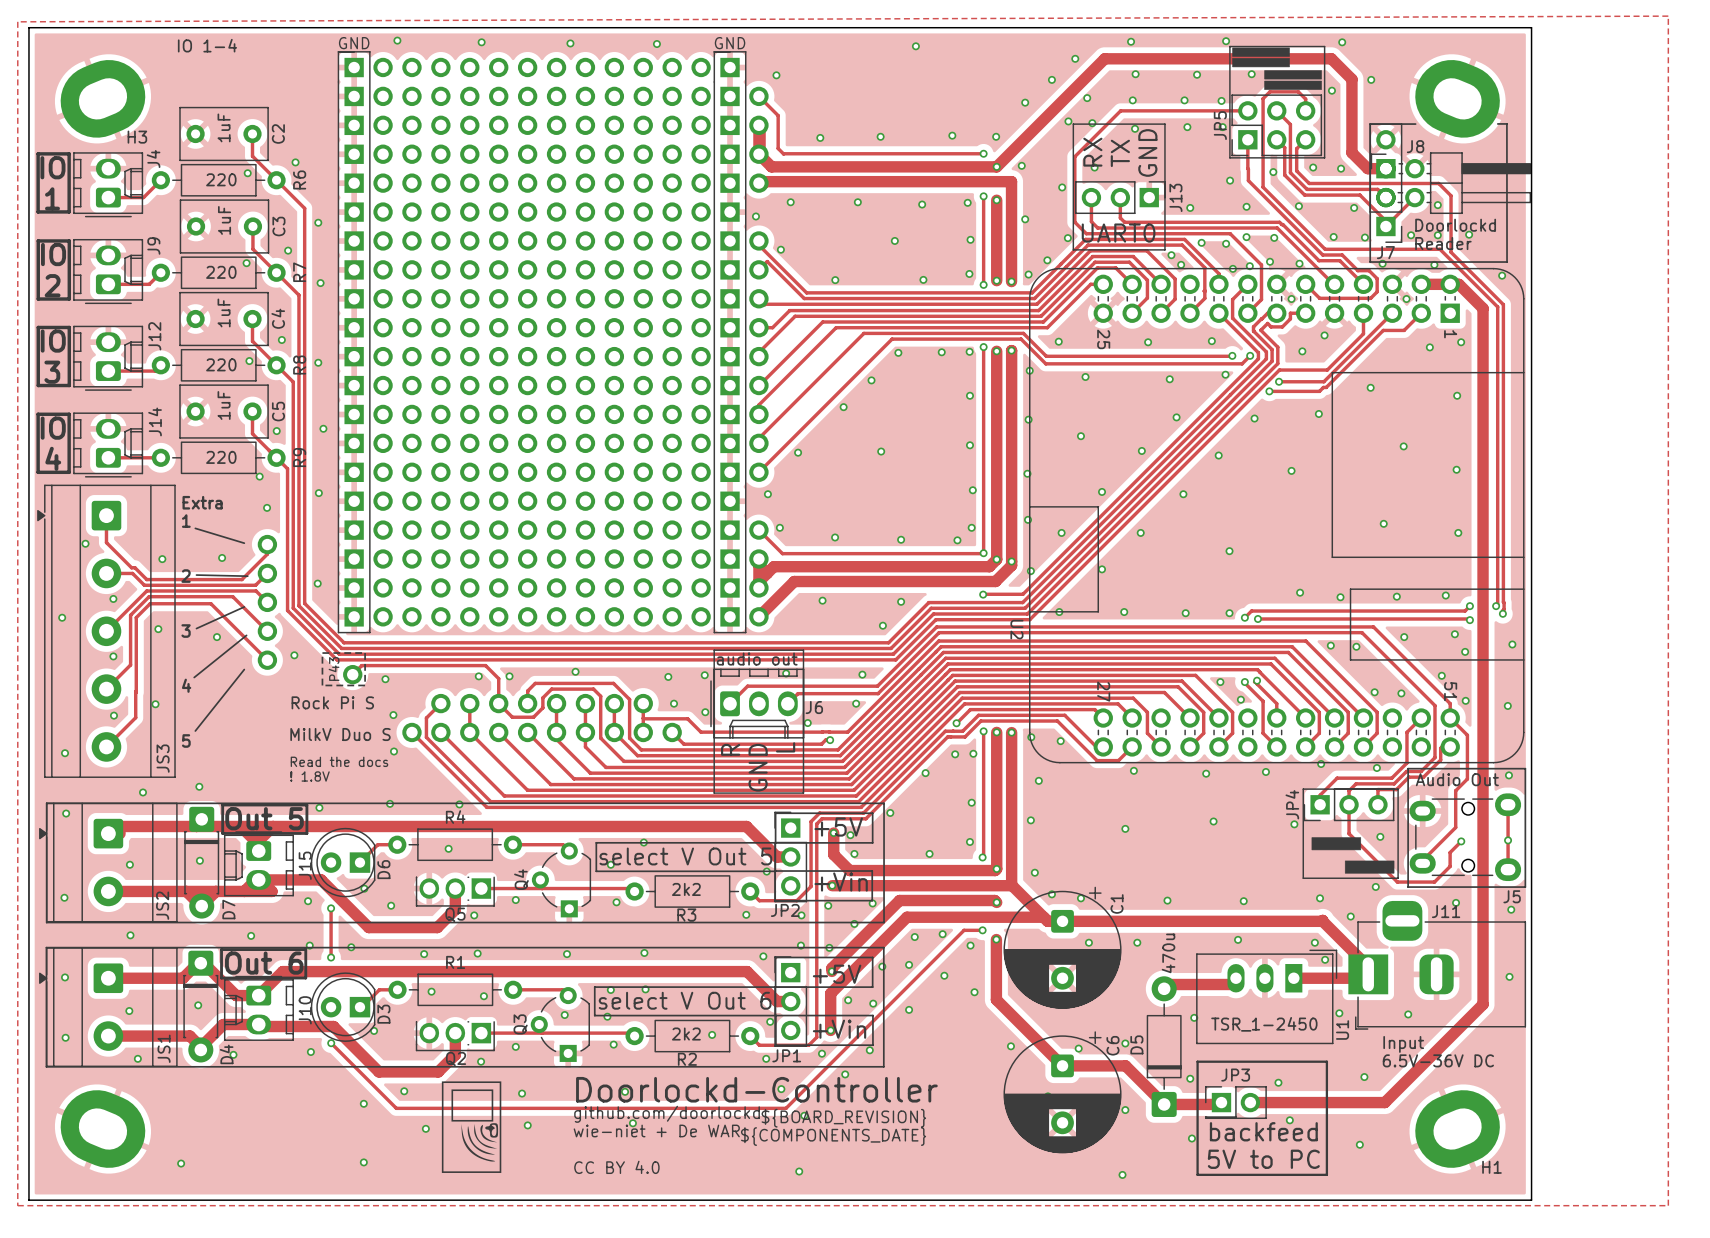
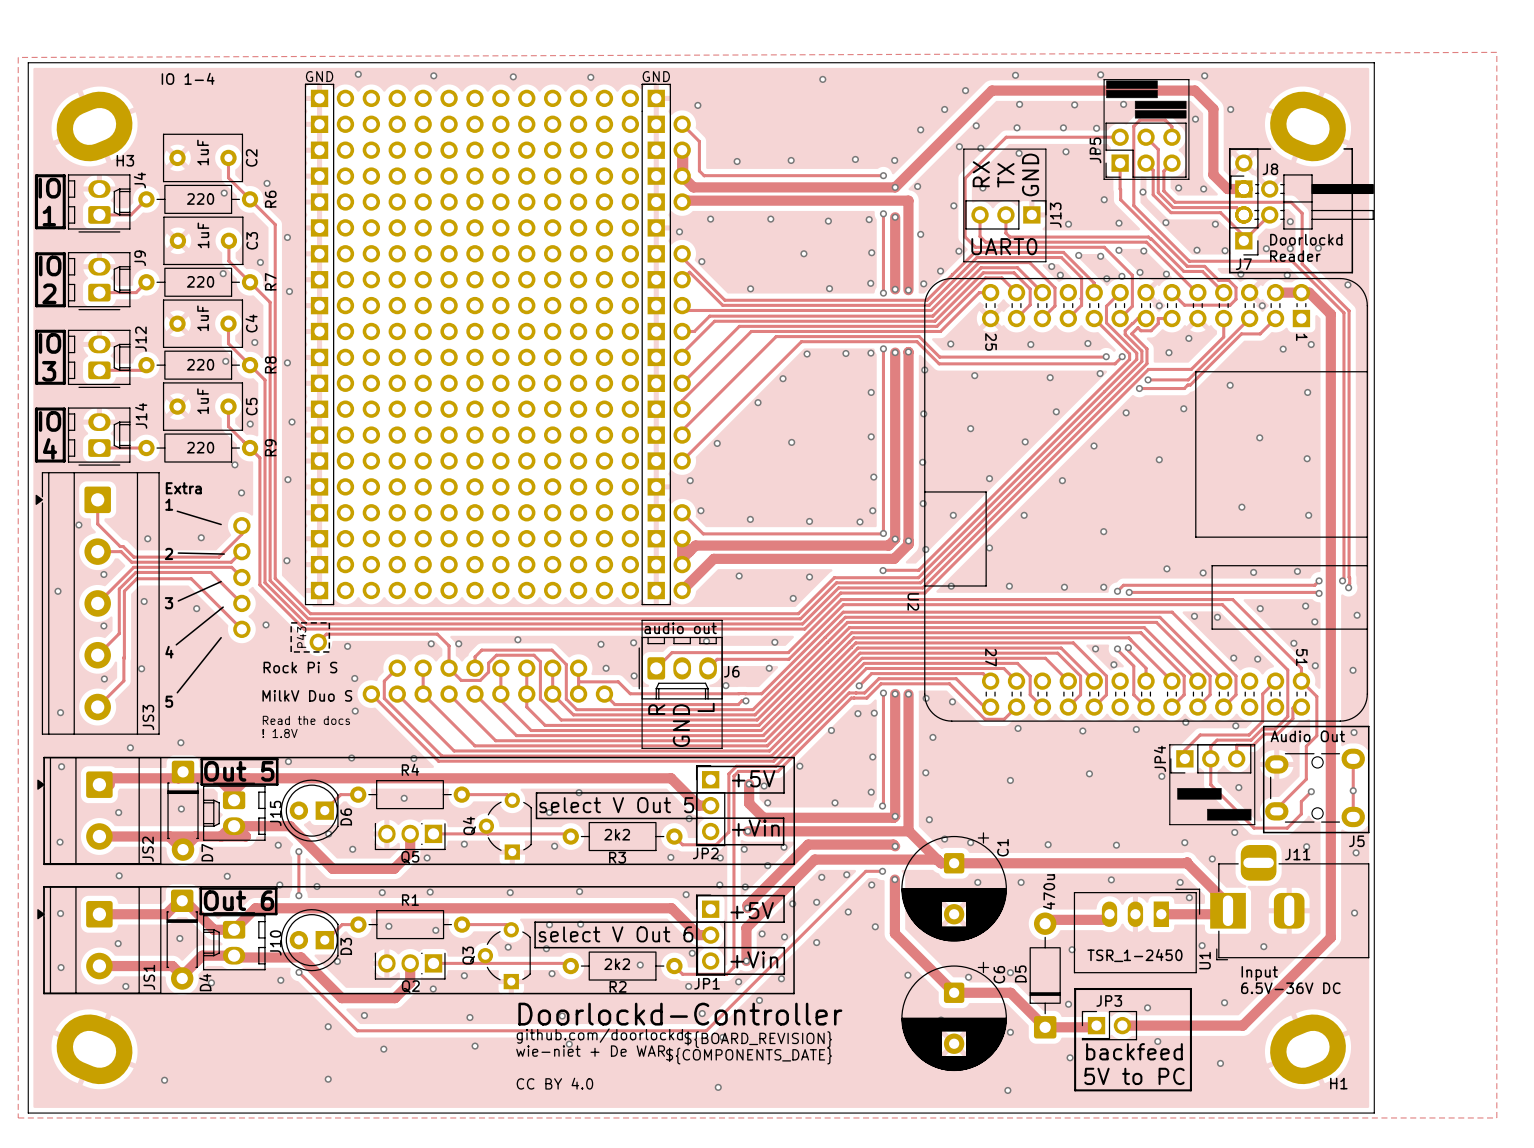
drawing: [441, 1081, 502, 1173] -> none

